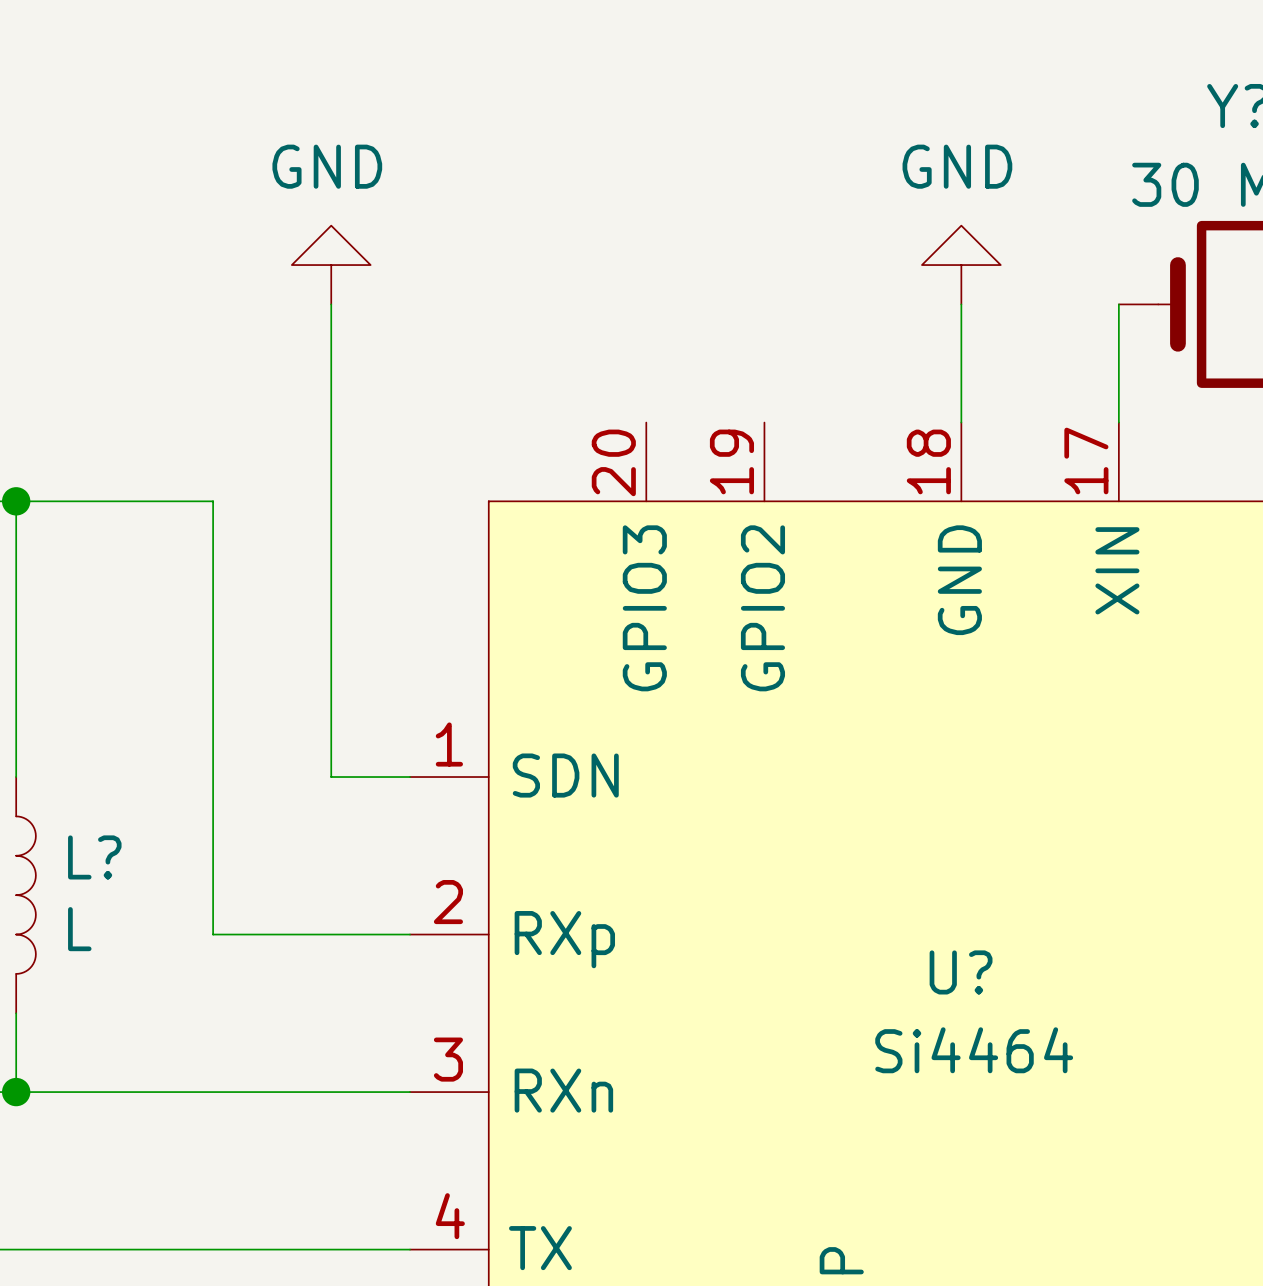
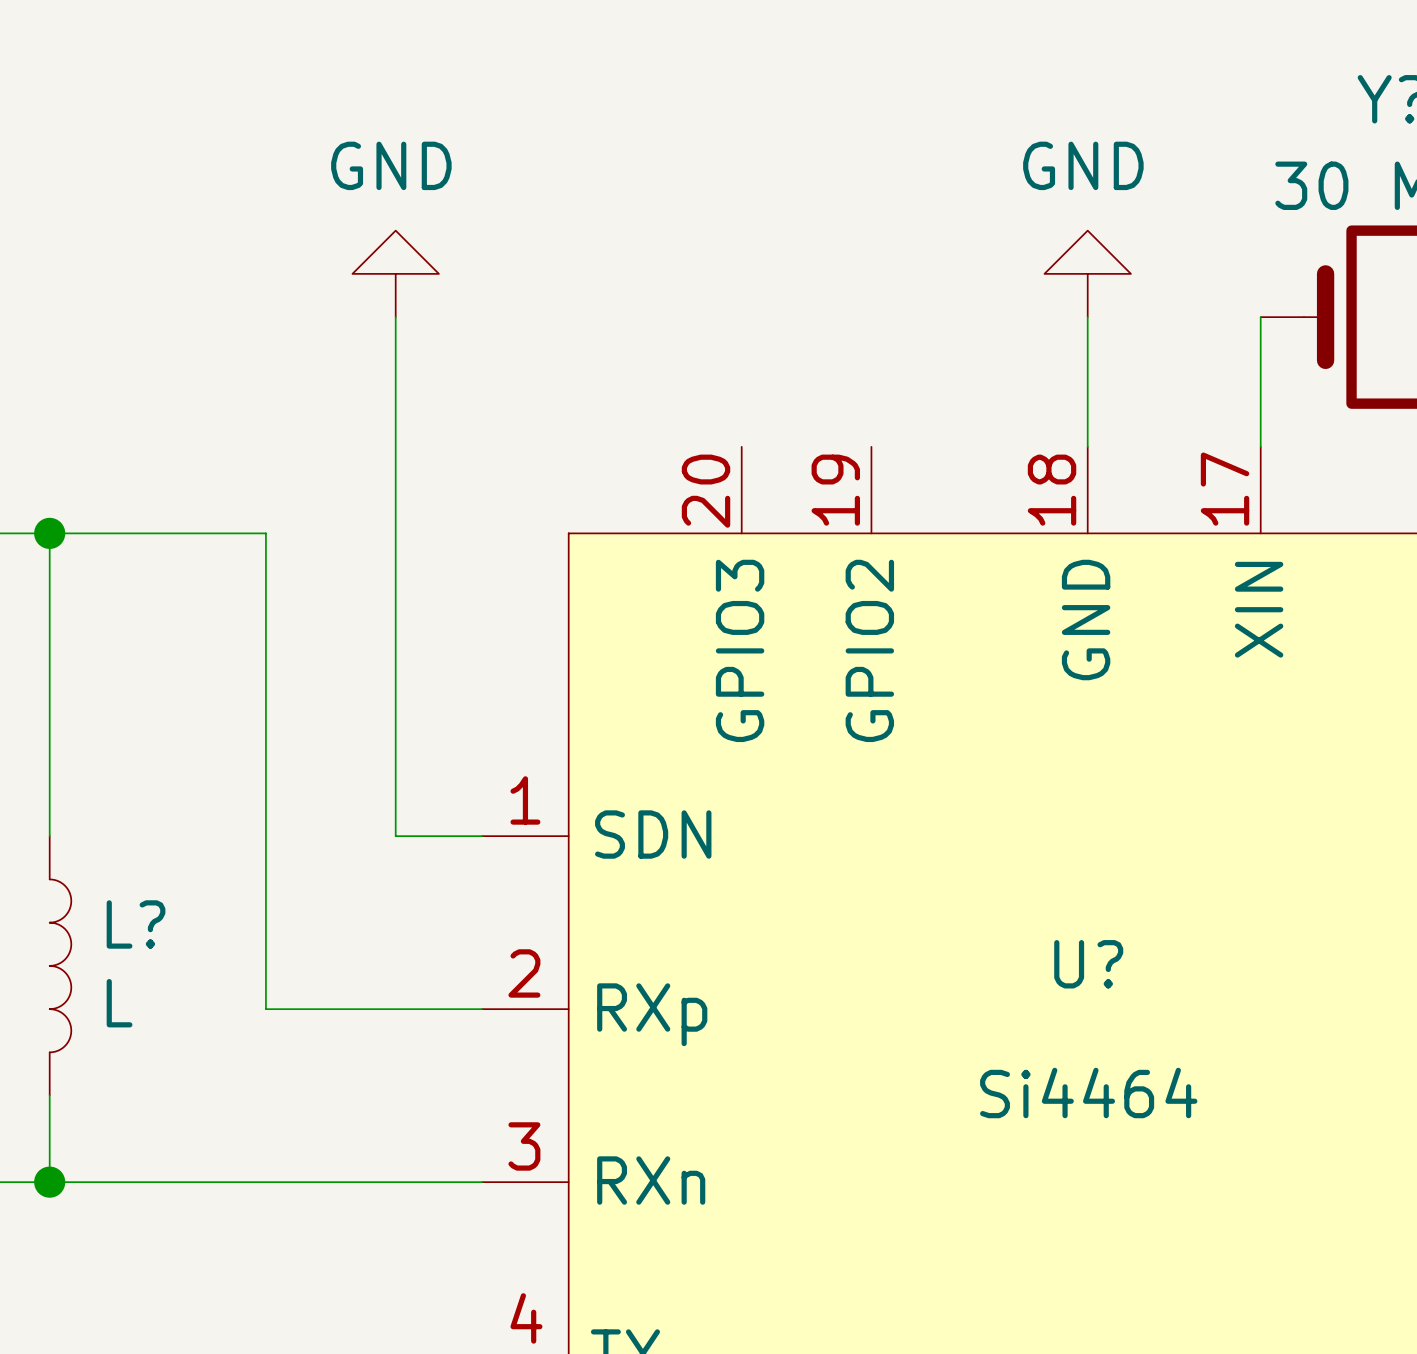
U? name position: U? (961, 972) -> U? (1088, 964)
U? value position: Si4464 (974, 1050) -> Si4464 (1088, 1092)

